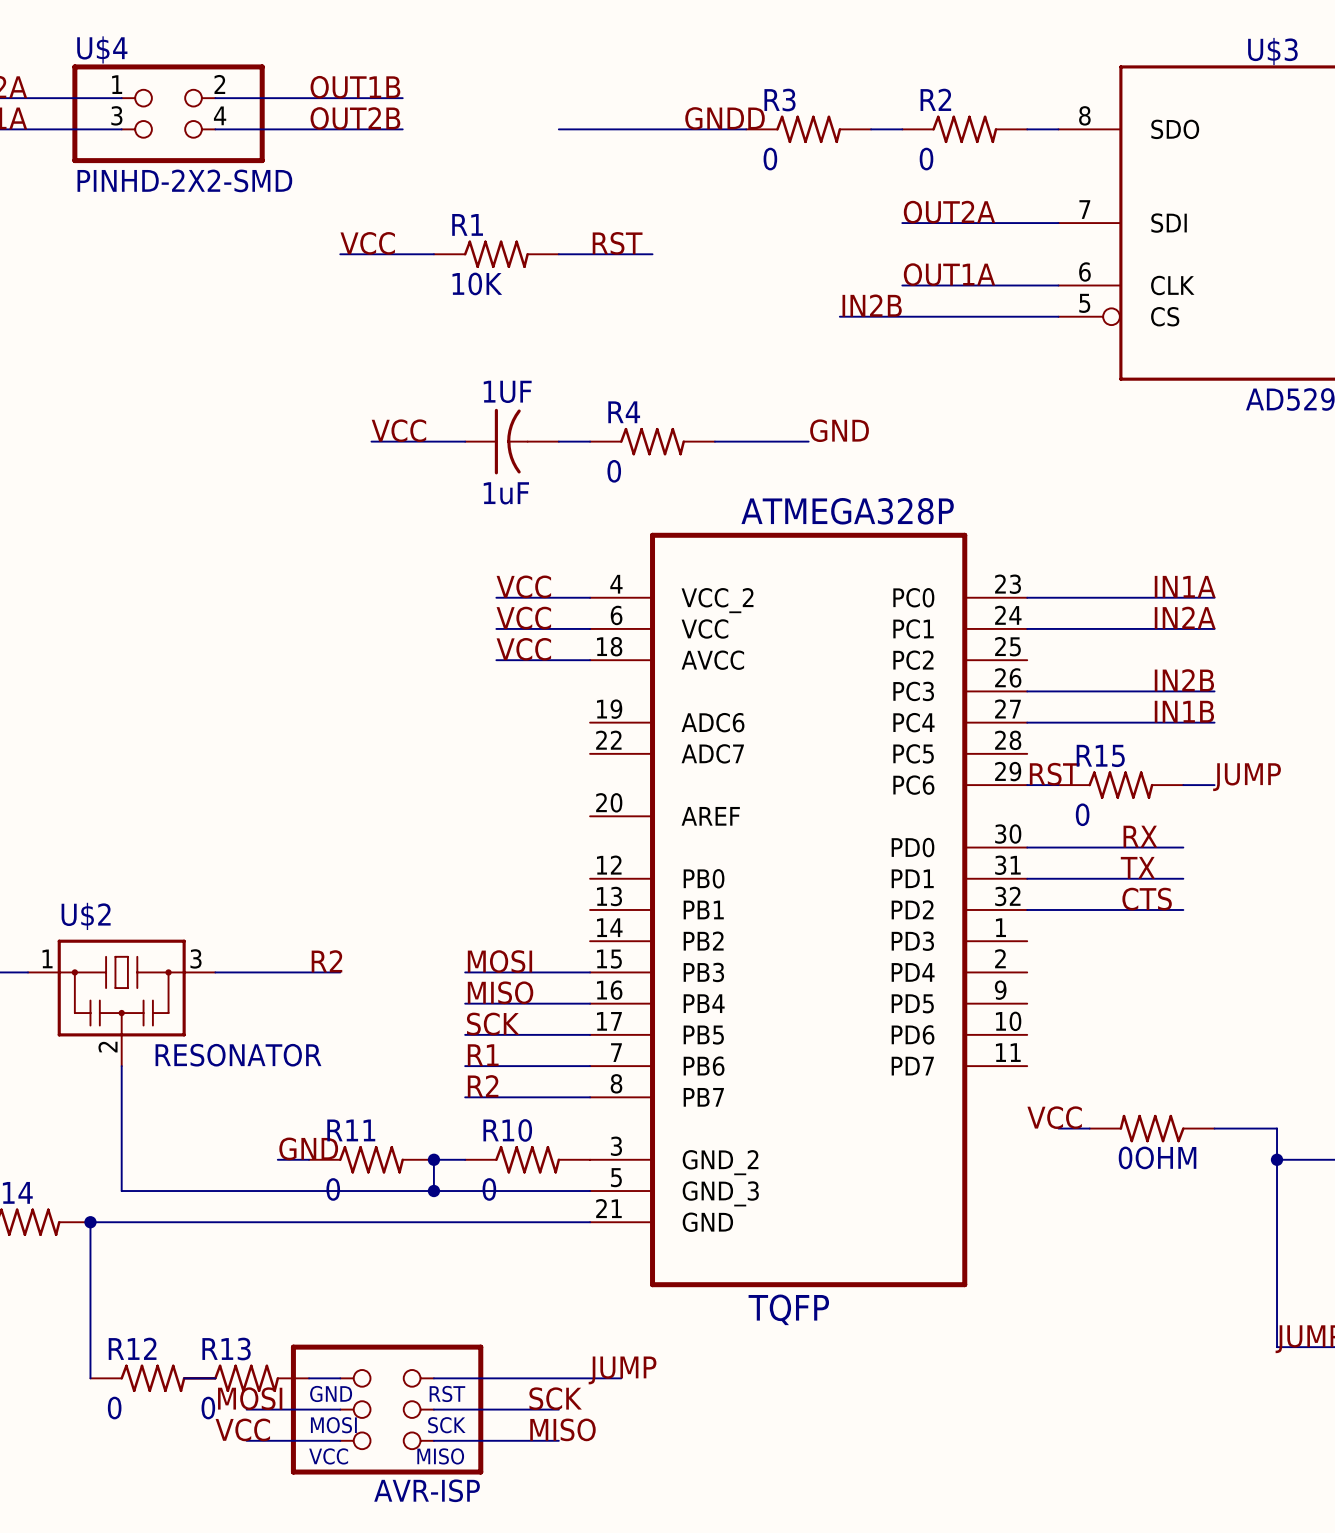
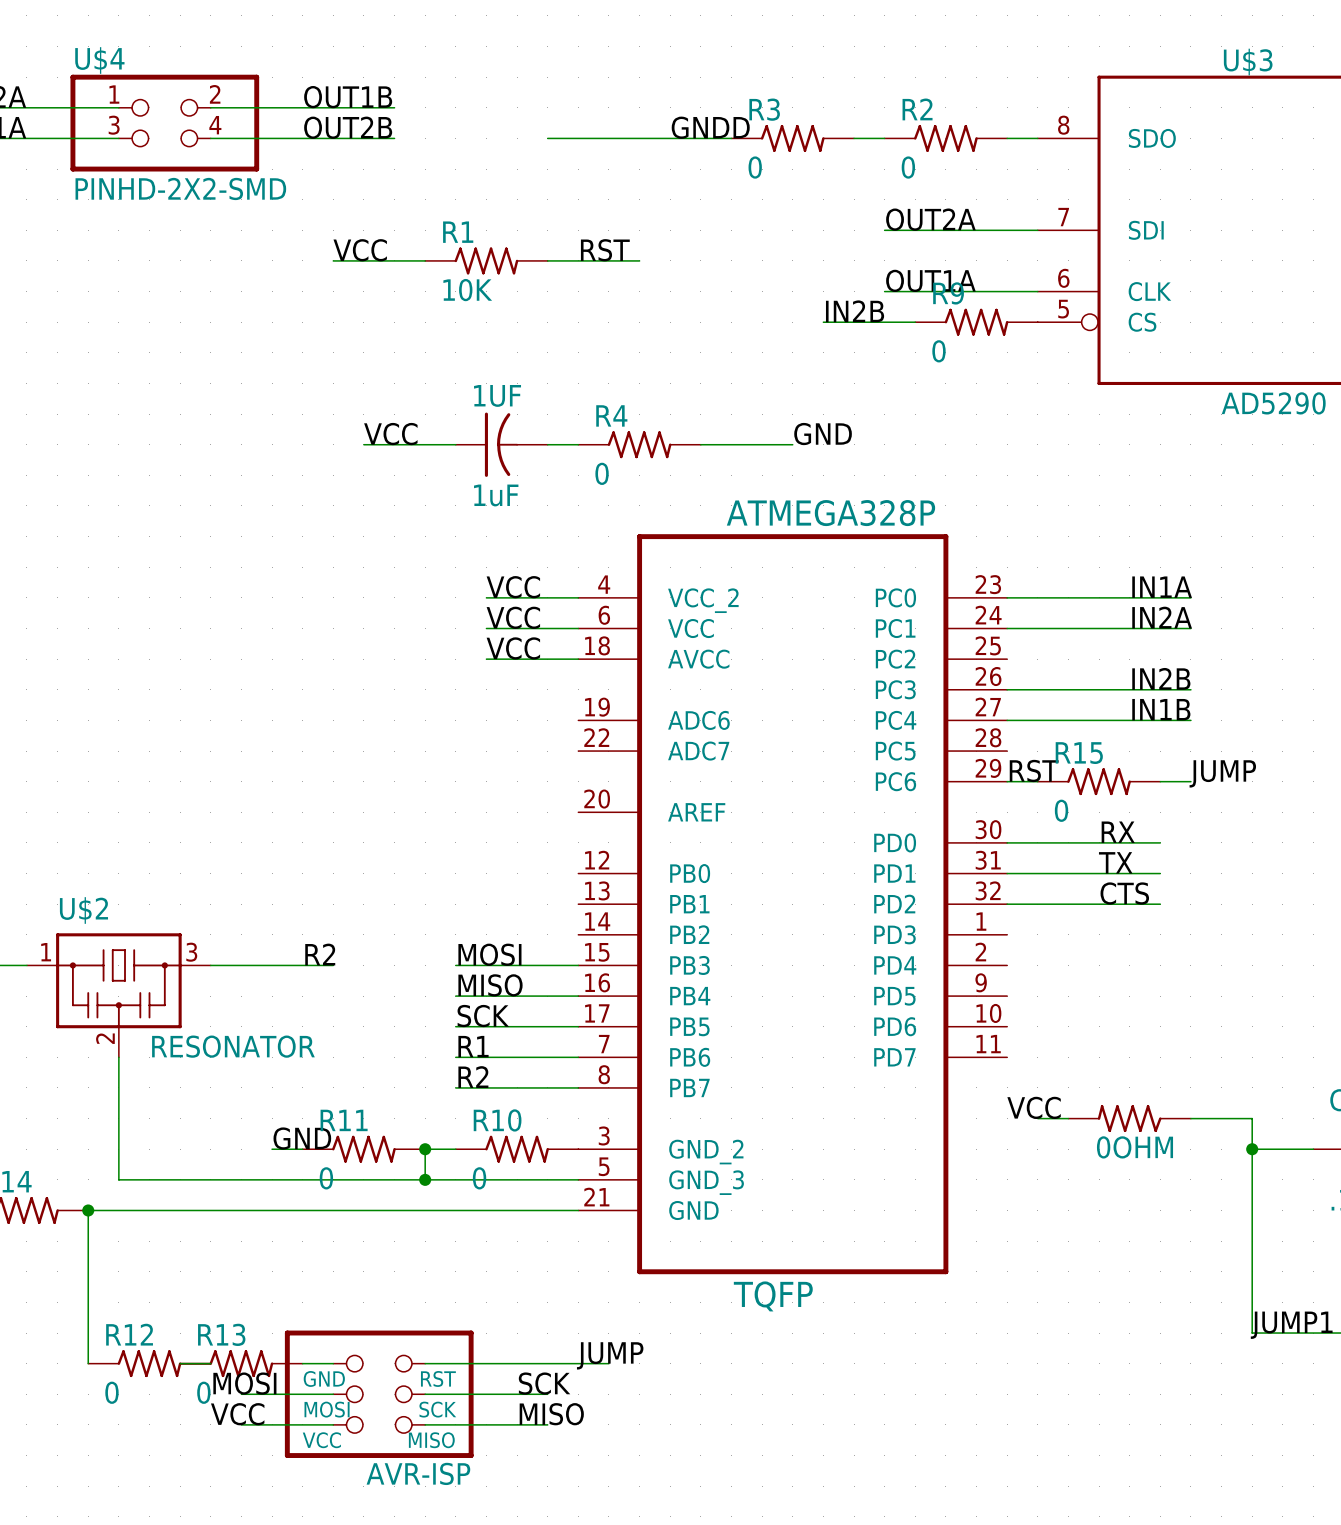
R9: none -> 0 (976, 322)

